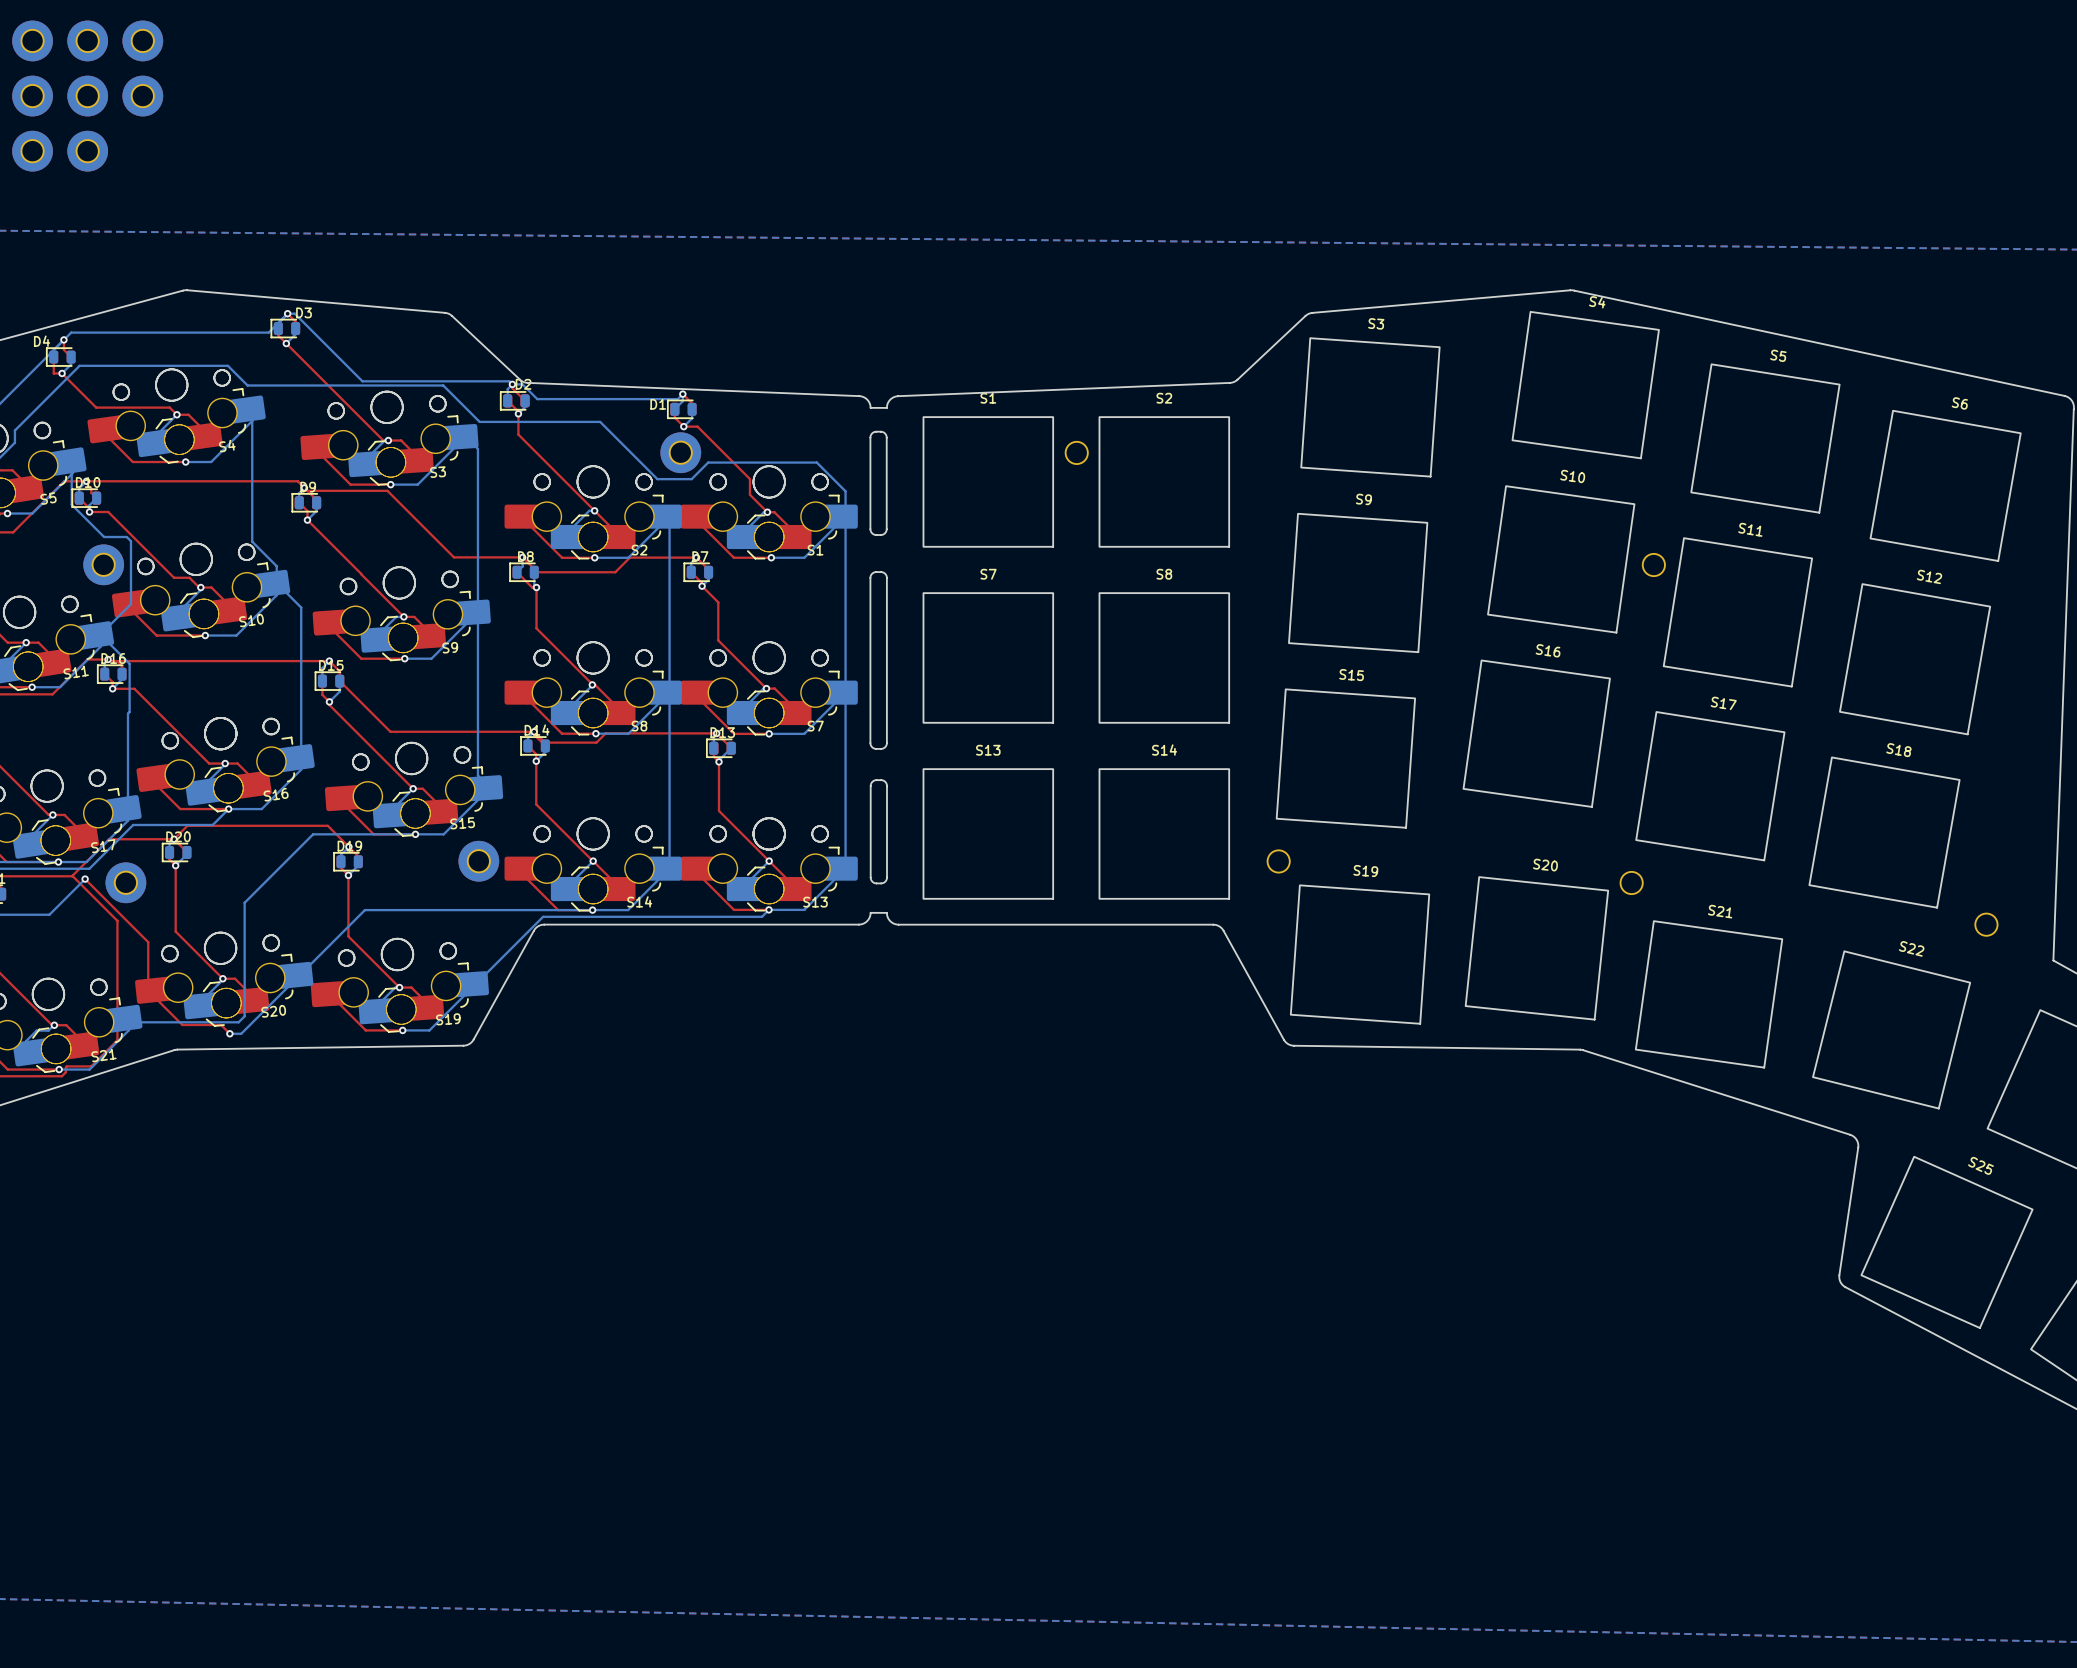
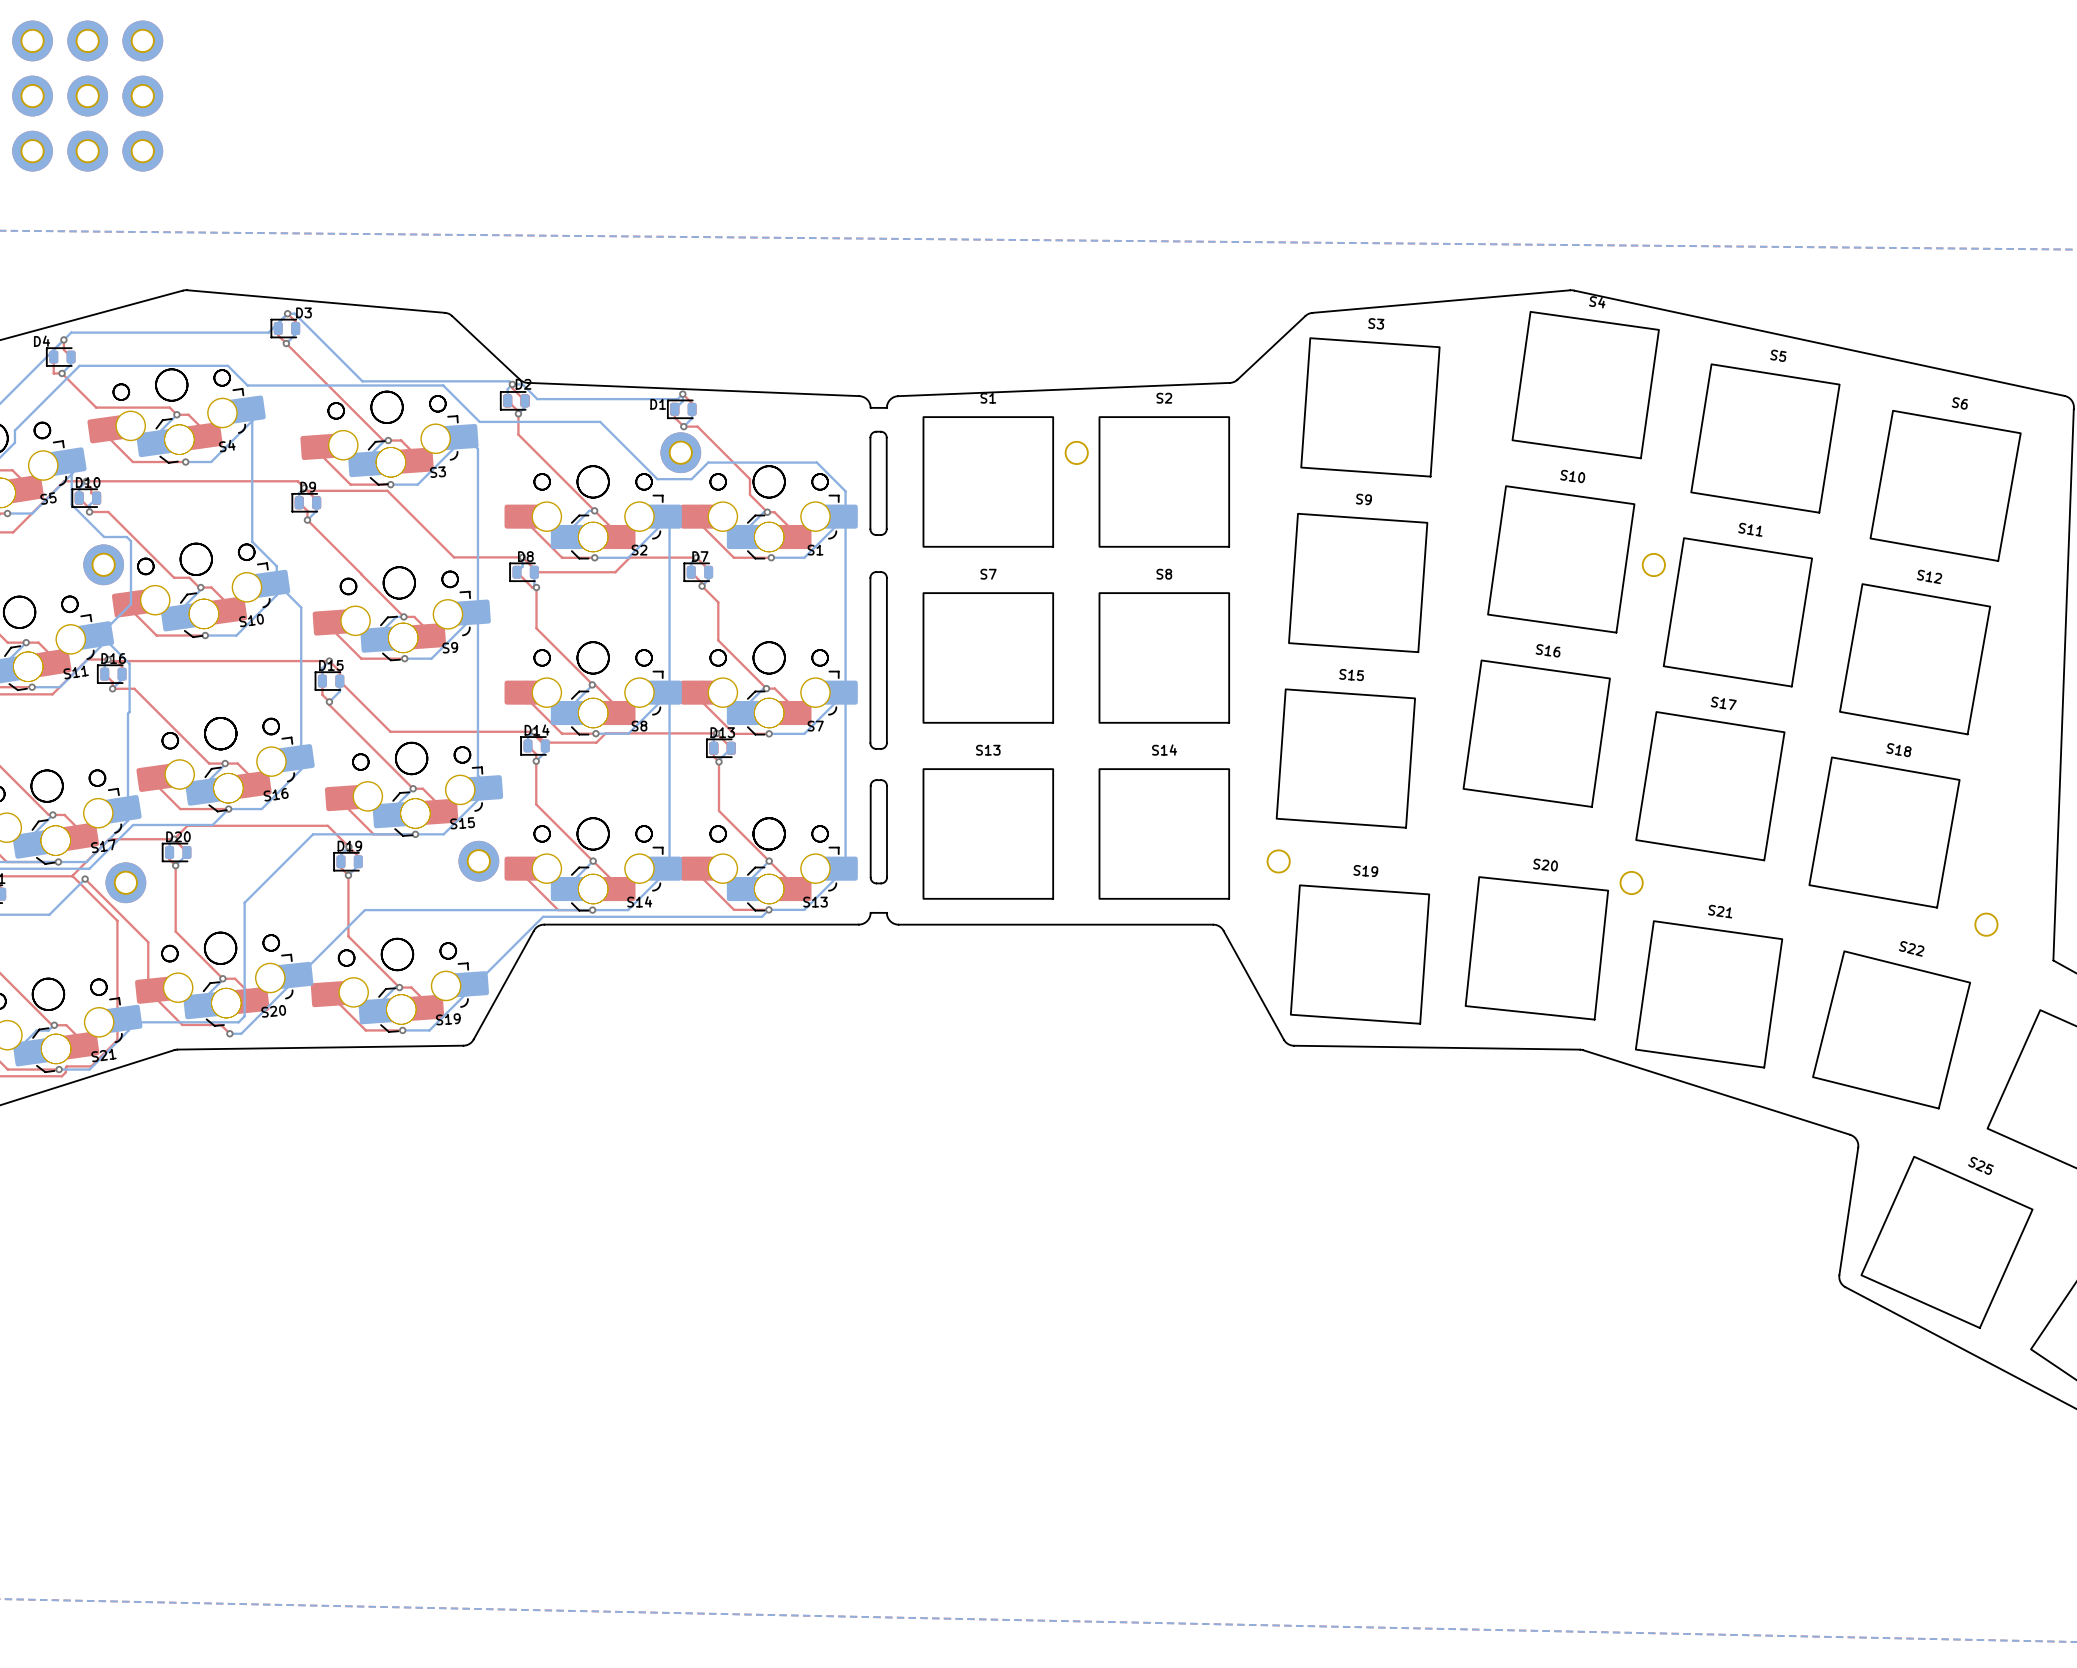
part: none -> (142, 151)

